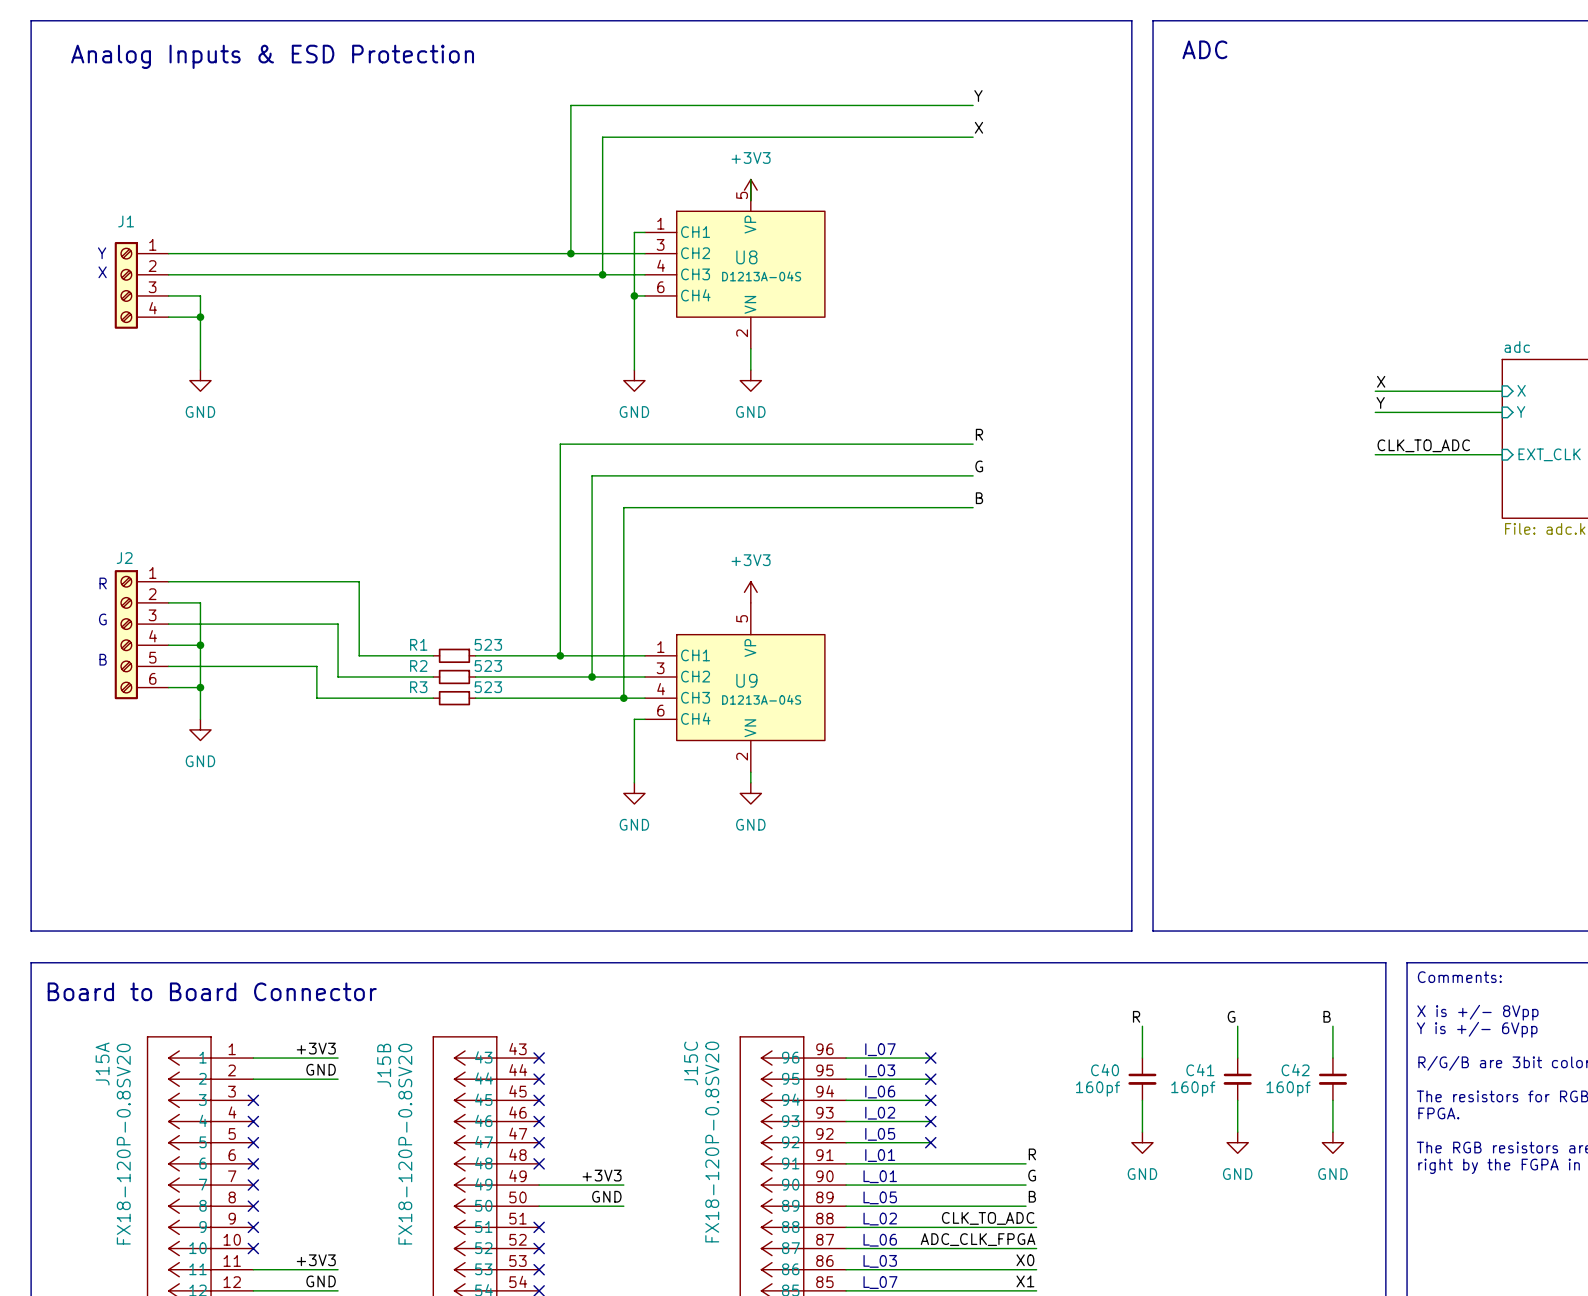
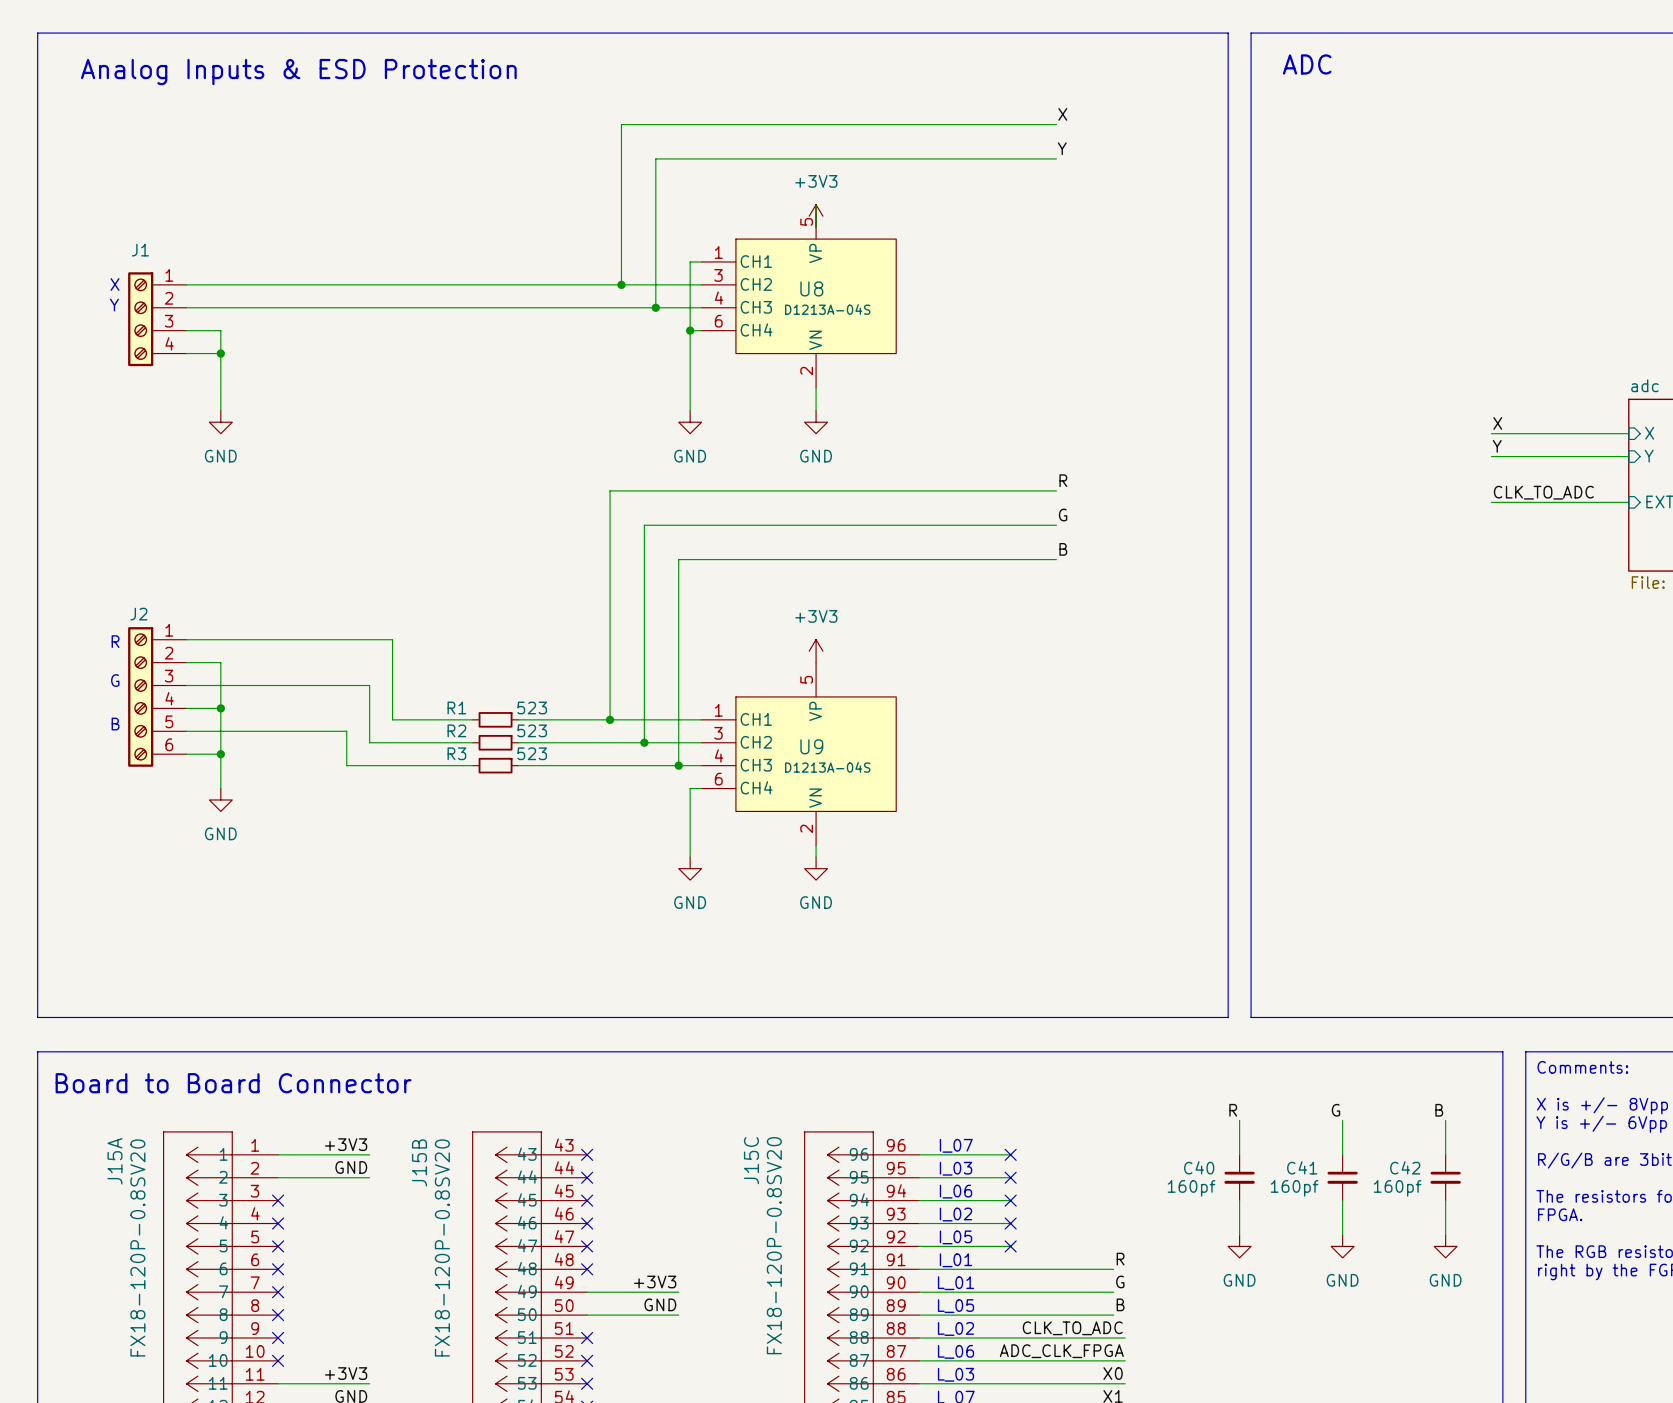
label: Y (978, 96) -> X (1062, 114)
label: X (978, 127) -> Y (1062, 148)
text: Y (102, 253) -> X (115, 284)
text: X (102, 272) -> Y (114, 305)

